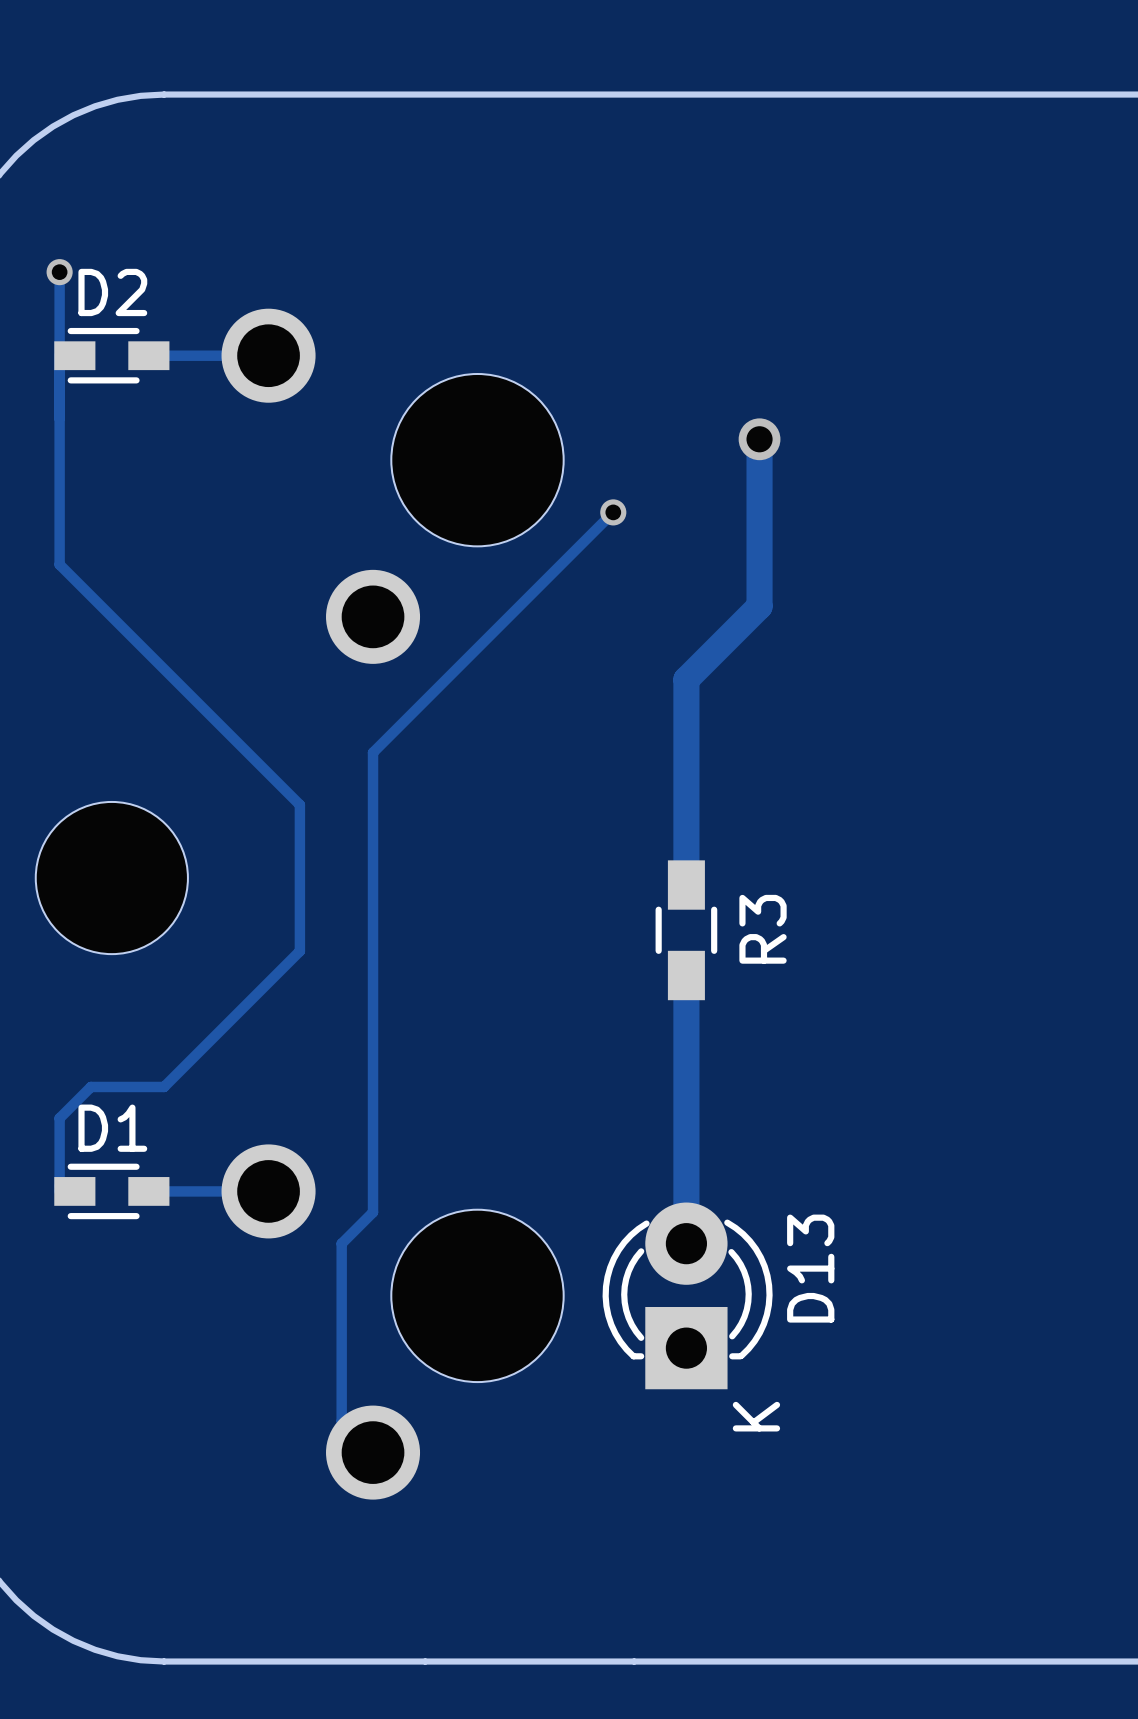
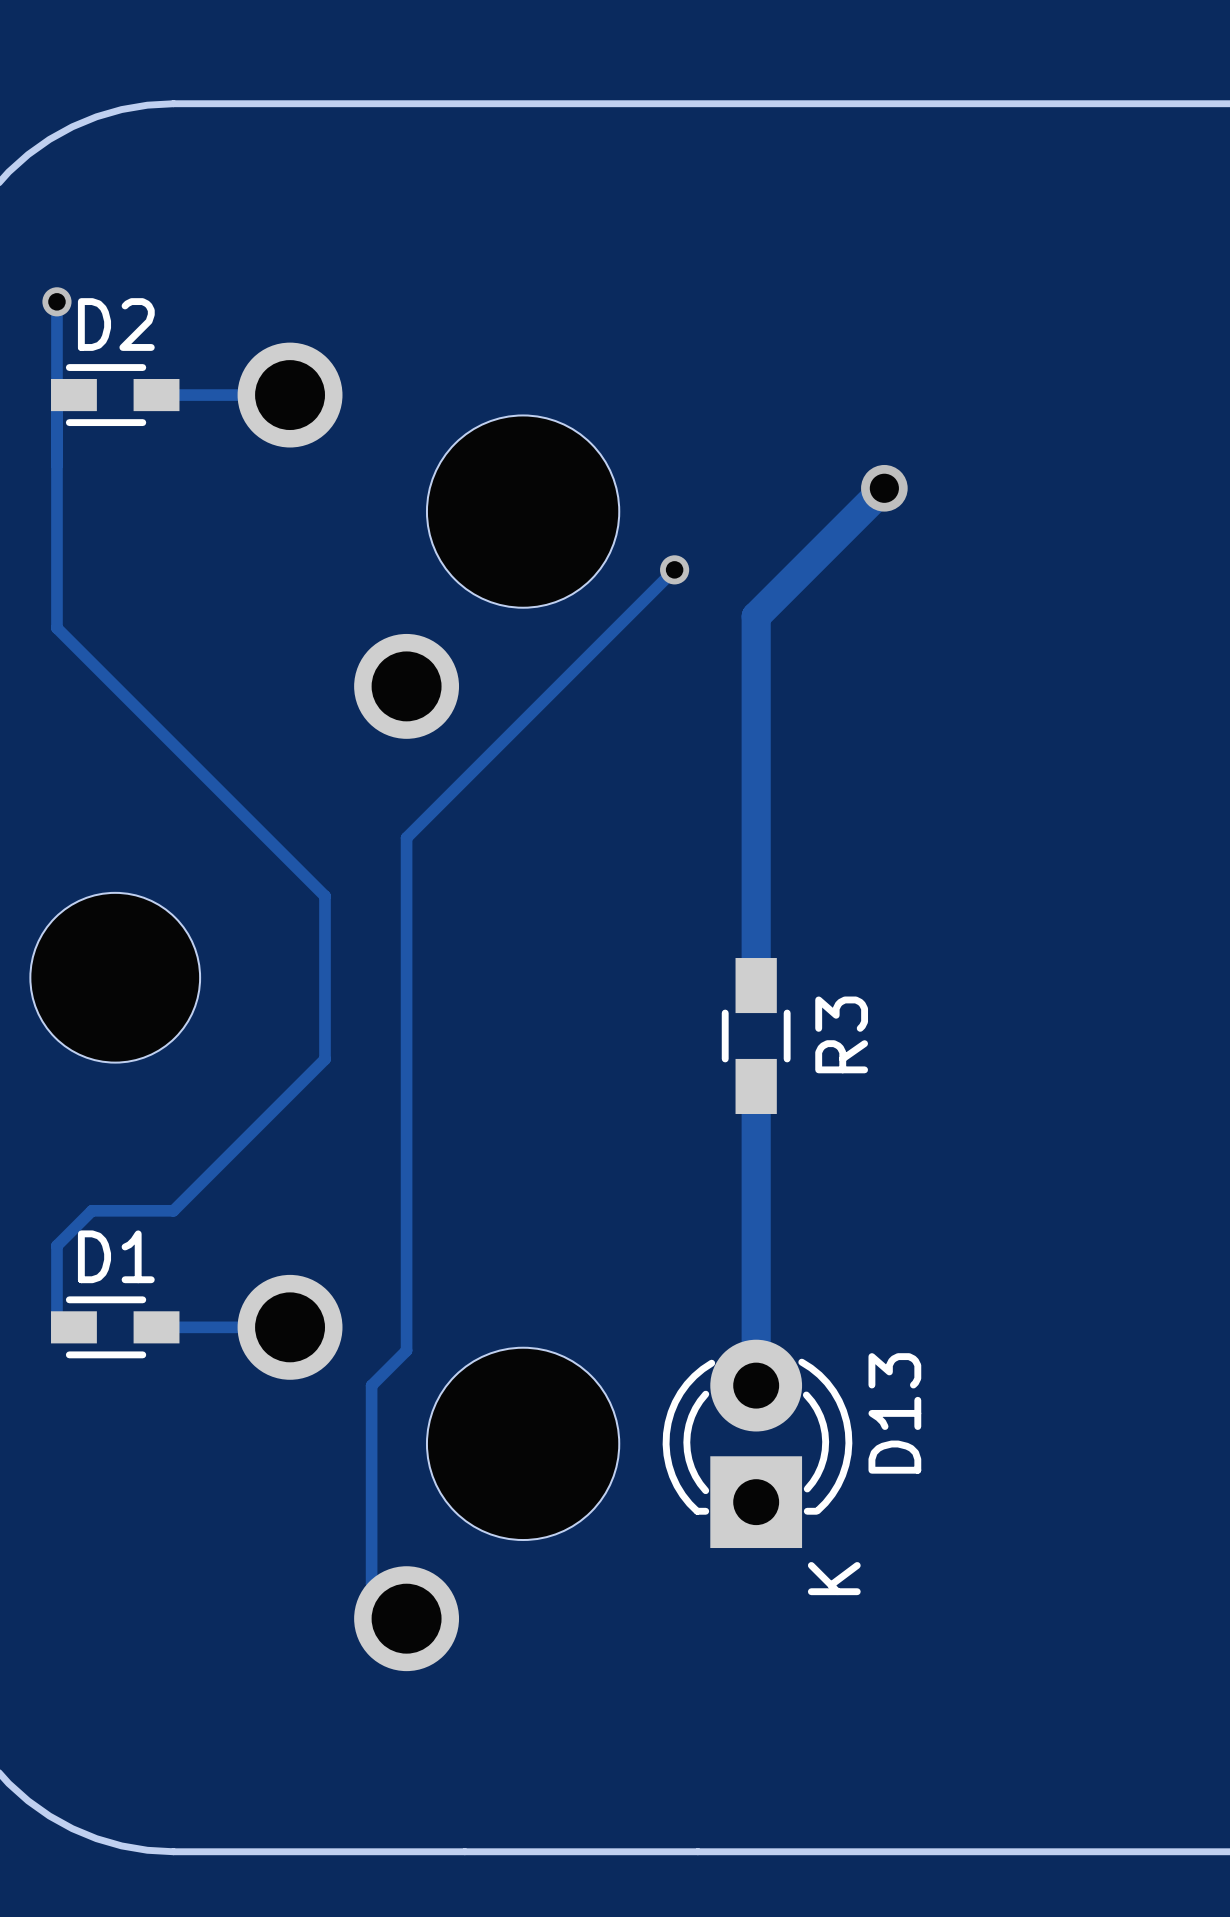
track: (759, 439) (759, 606) (686, 679) -> (884, 488) (756, 616) (756, 756)
via position: (759, 439) -> (884, 488)

